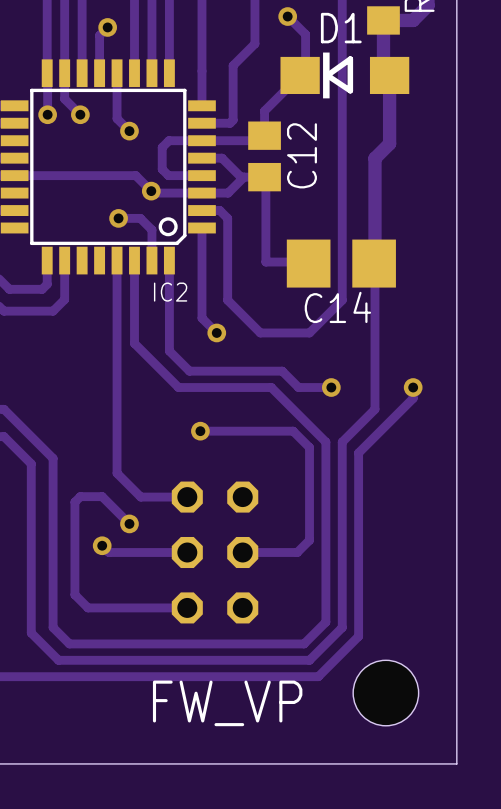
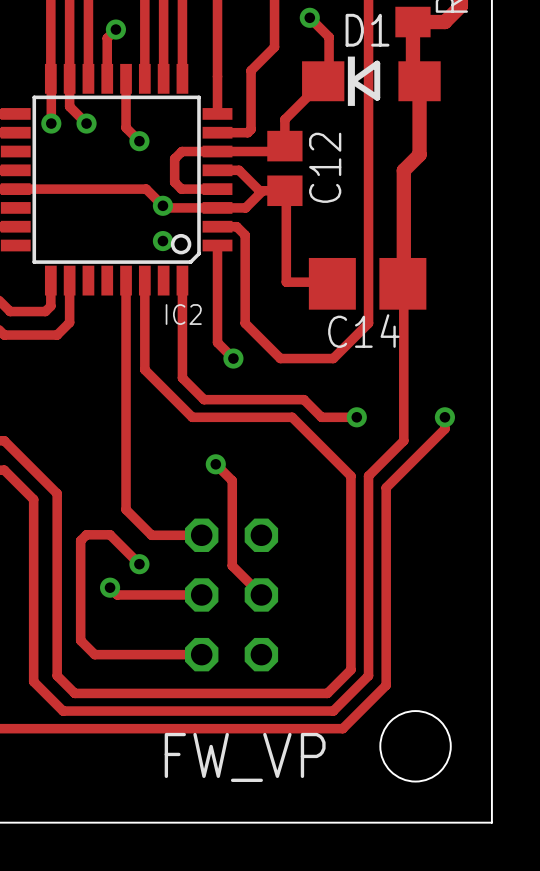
track: (118, 218) (140, 218) (151, 229) (151, 260) -> none
via position: (118, 218) -> (162, 241)
track: (200, 431) (293, 431) (309, 447) (309, 540) (297, 552) (242, 552) -> (215, 464) (232, 480) (232, 565) (261, 594)

